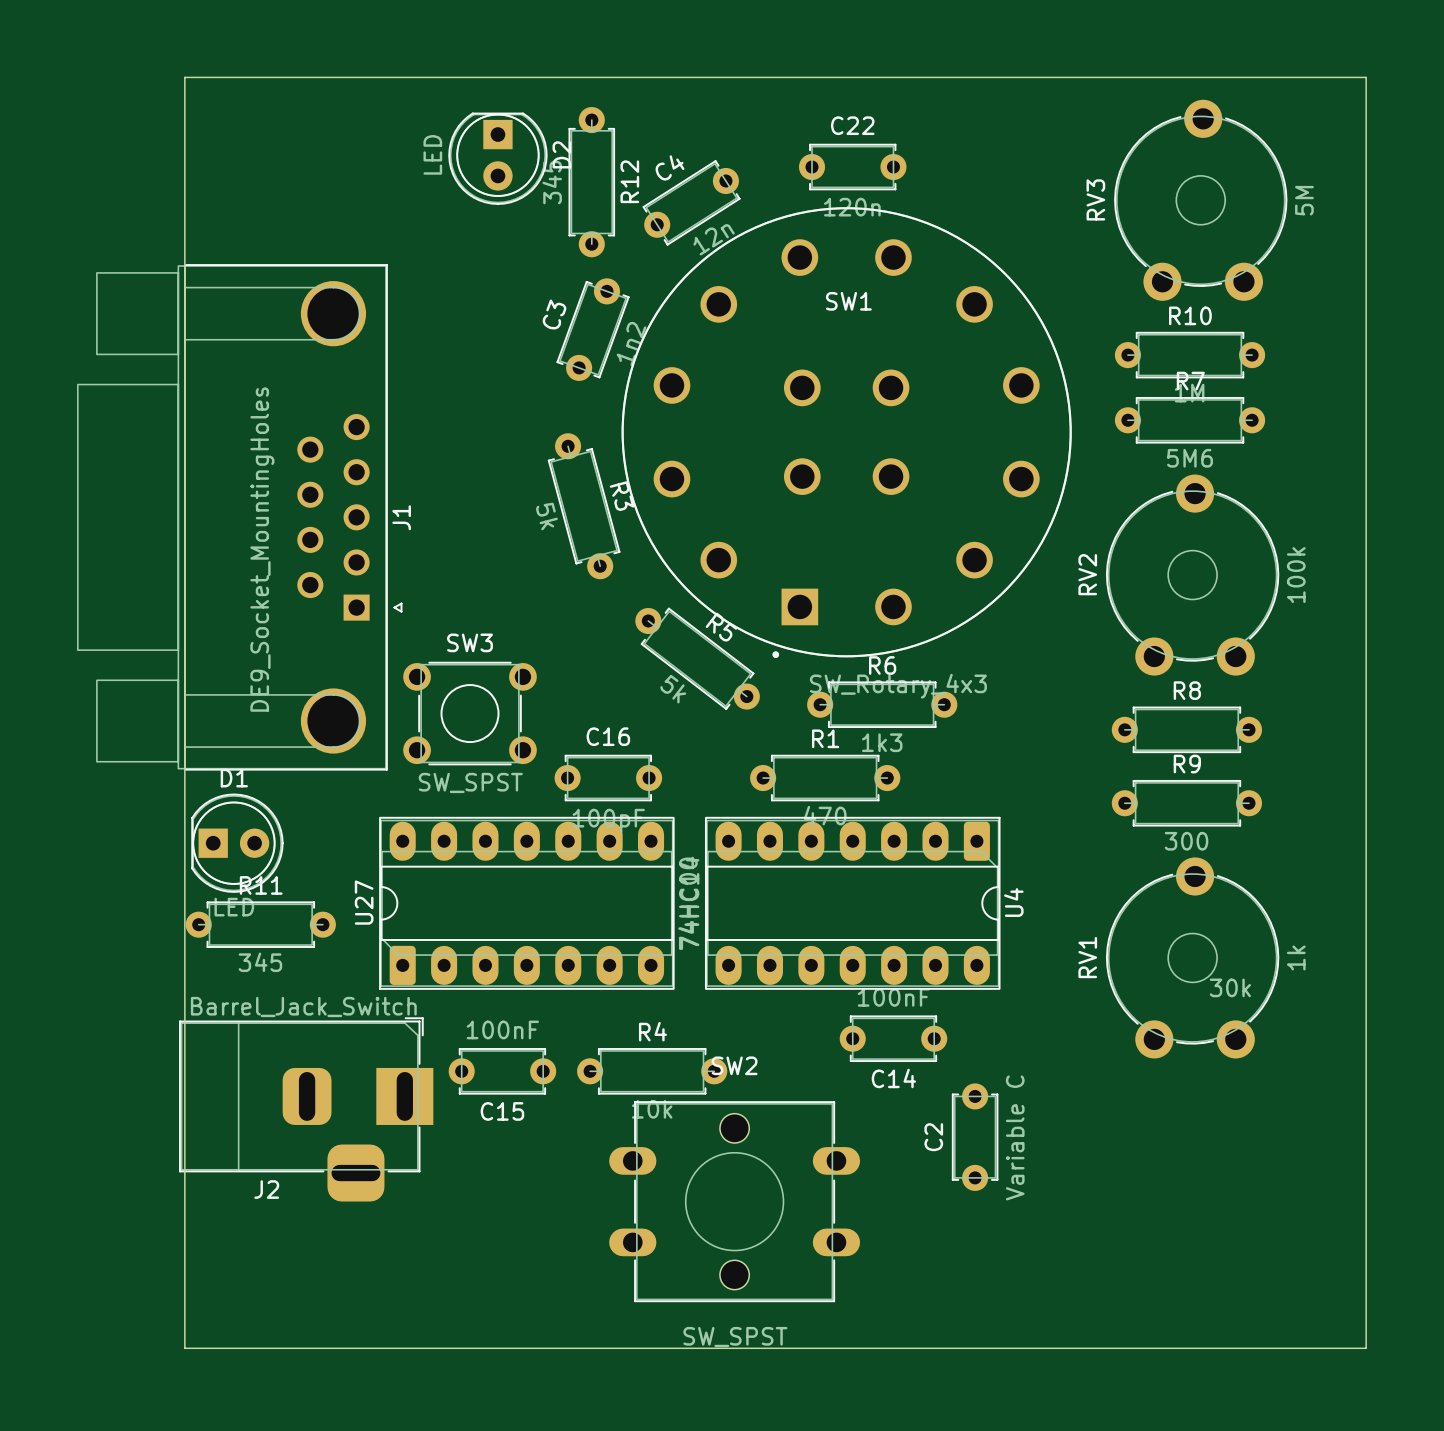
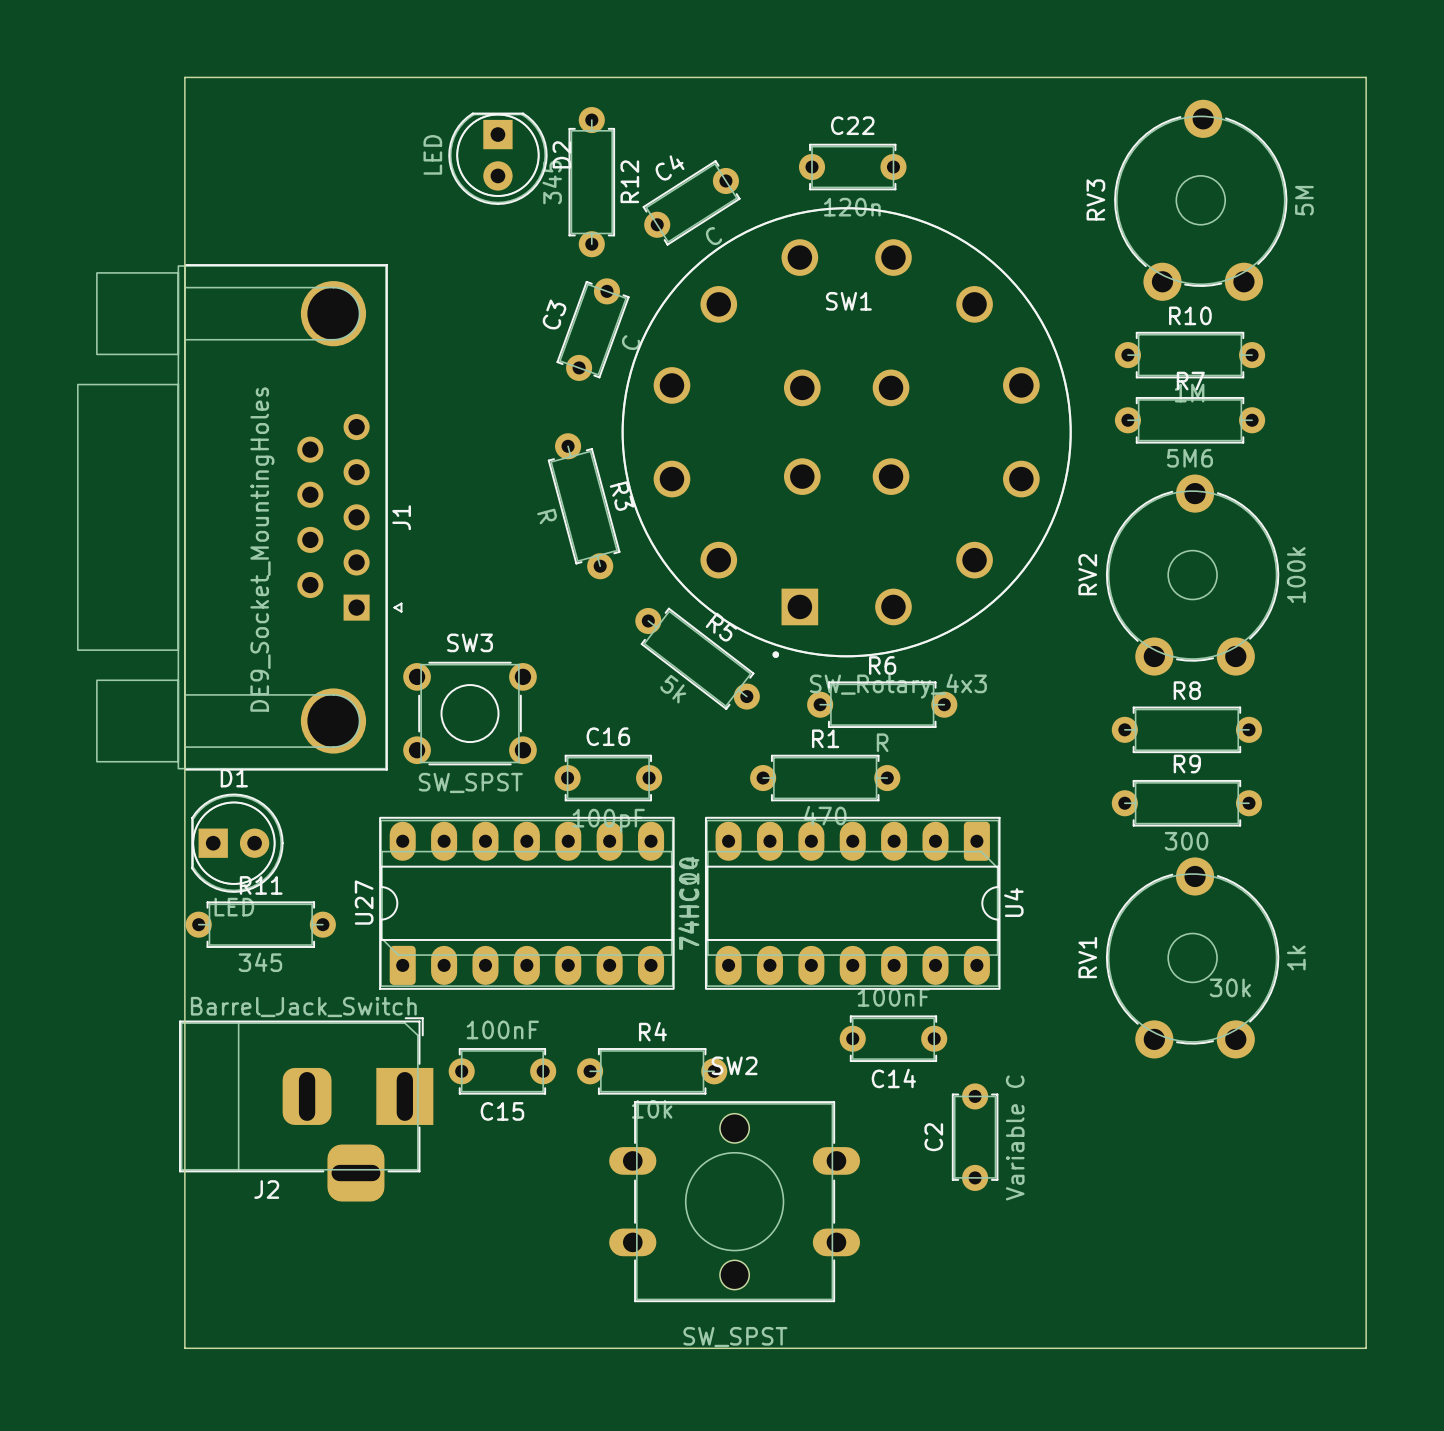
C4 value: 12n (714, 239) -> C (714, 236)
C3 value: 1n2 (631, 343) -> C (631, 342)
R3 value: 5k (546, 516) -> R (547, 516)
R6 value: 1k3 (882, 742) -> R (882, 742)

